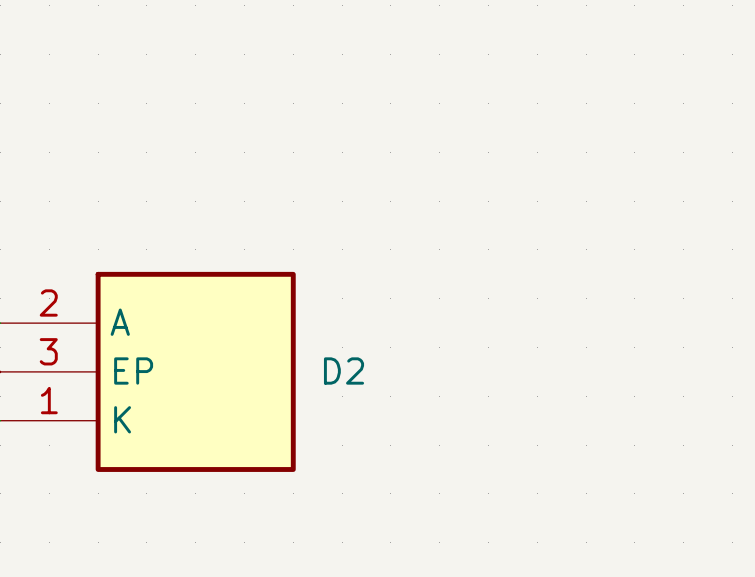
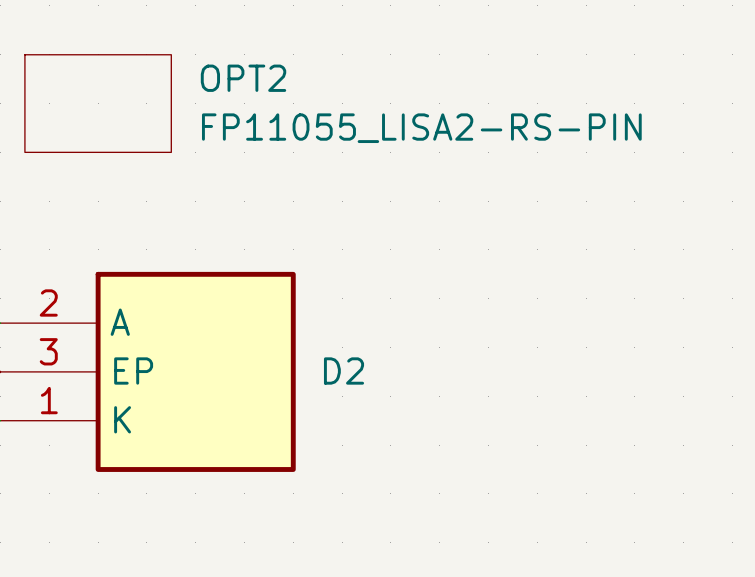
OPT2: none -> FP11055_LISA2-RS-PIN (98, 103)

